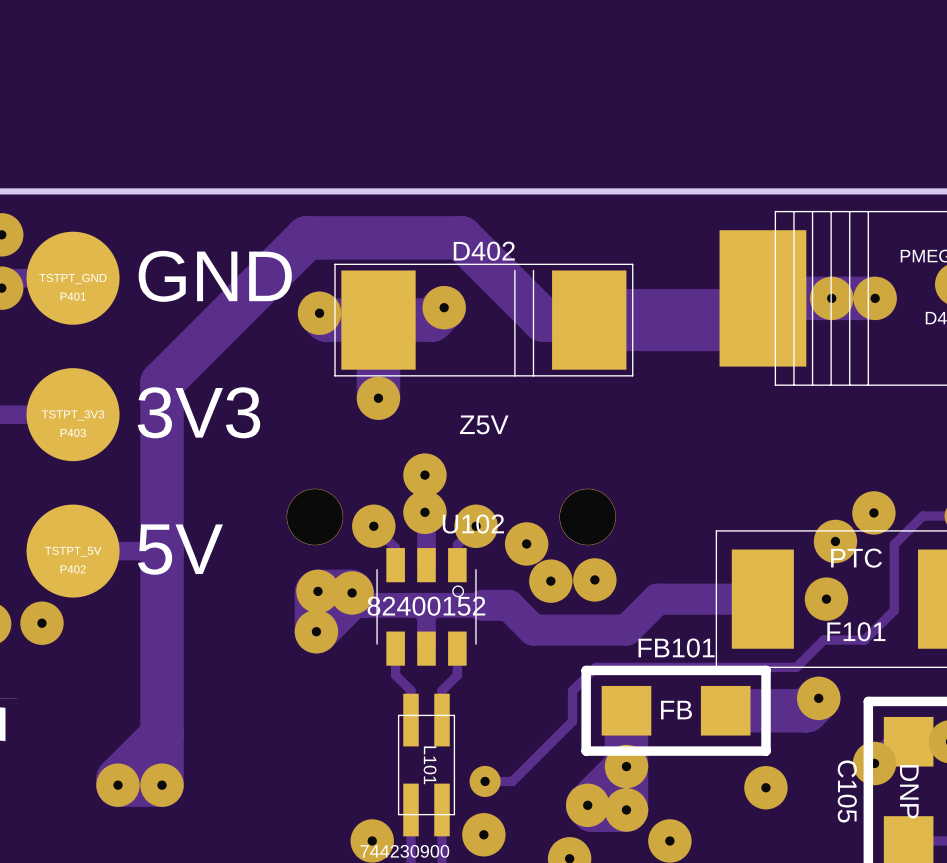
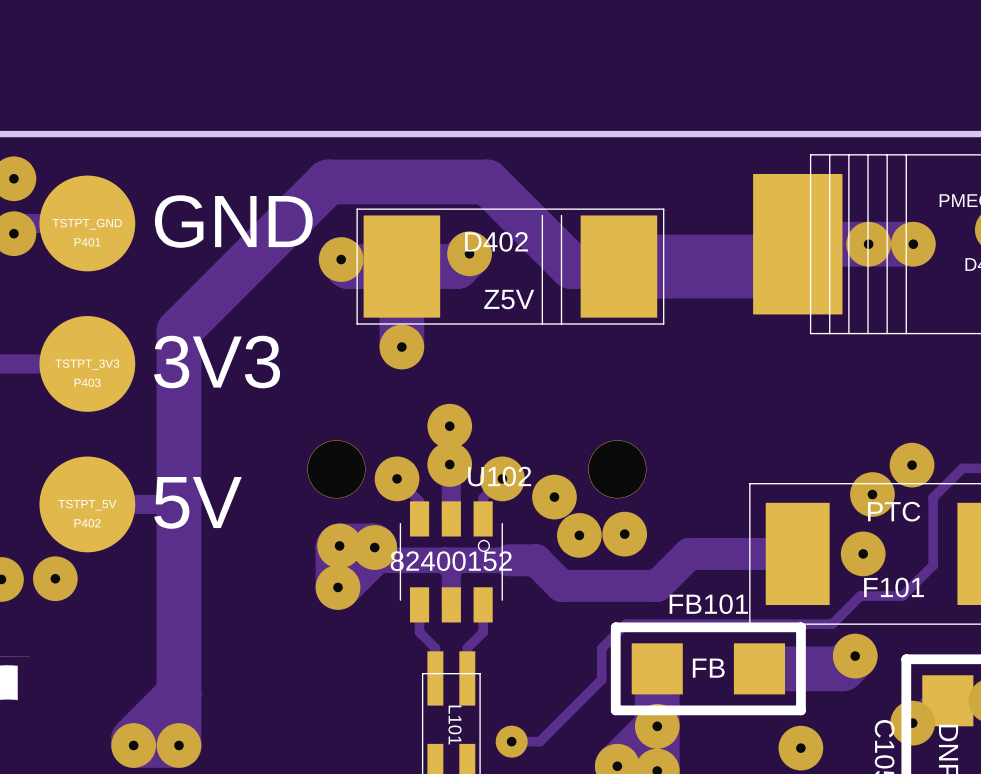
D402 name position: D402 (484, 251) -> D402 (496, 241)
D402 value position: Z5V (484, 424) -> Z5V (509, 299)

